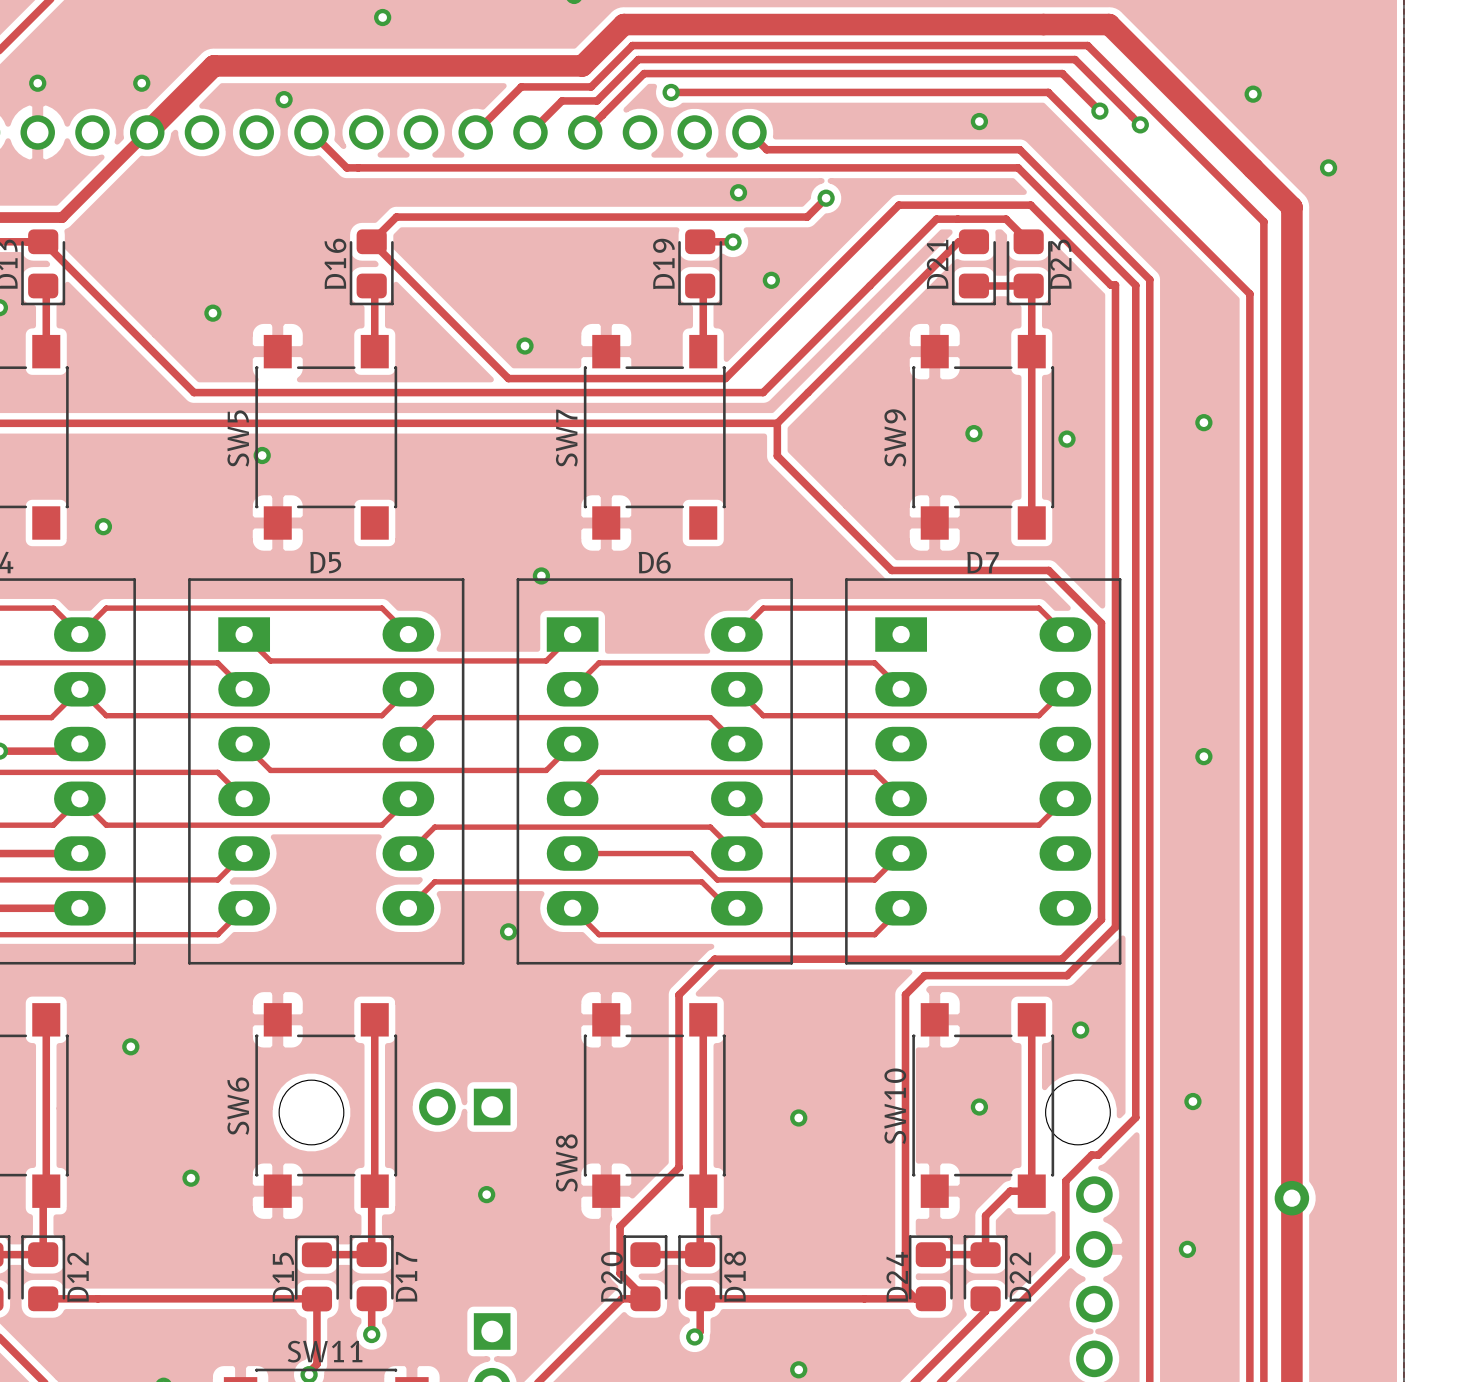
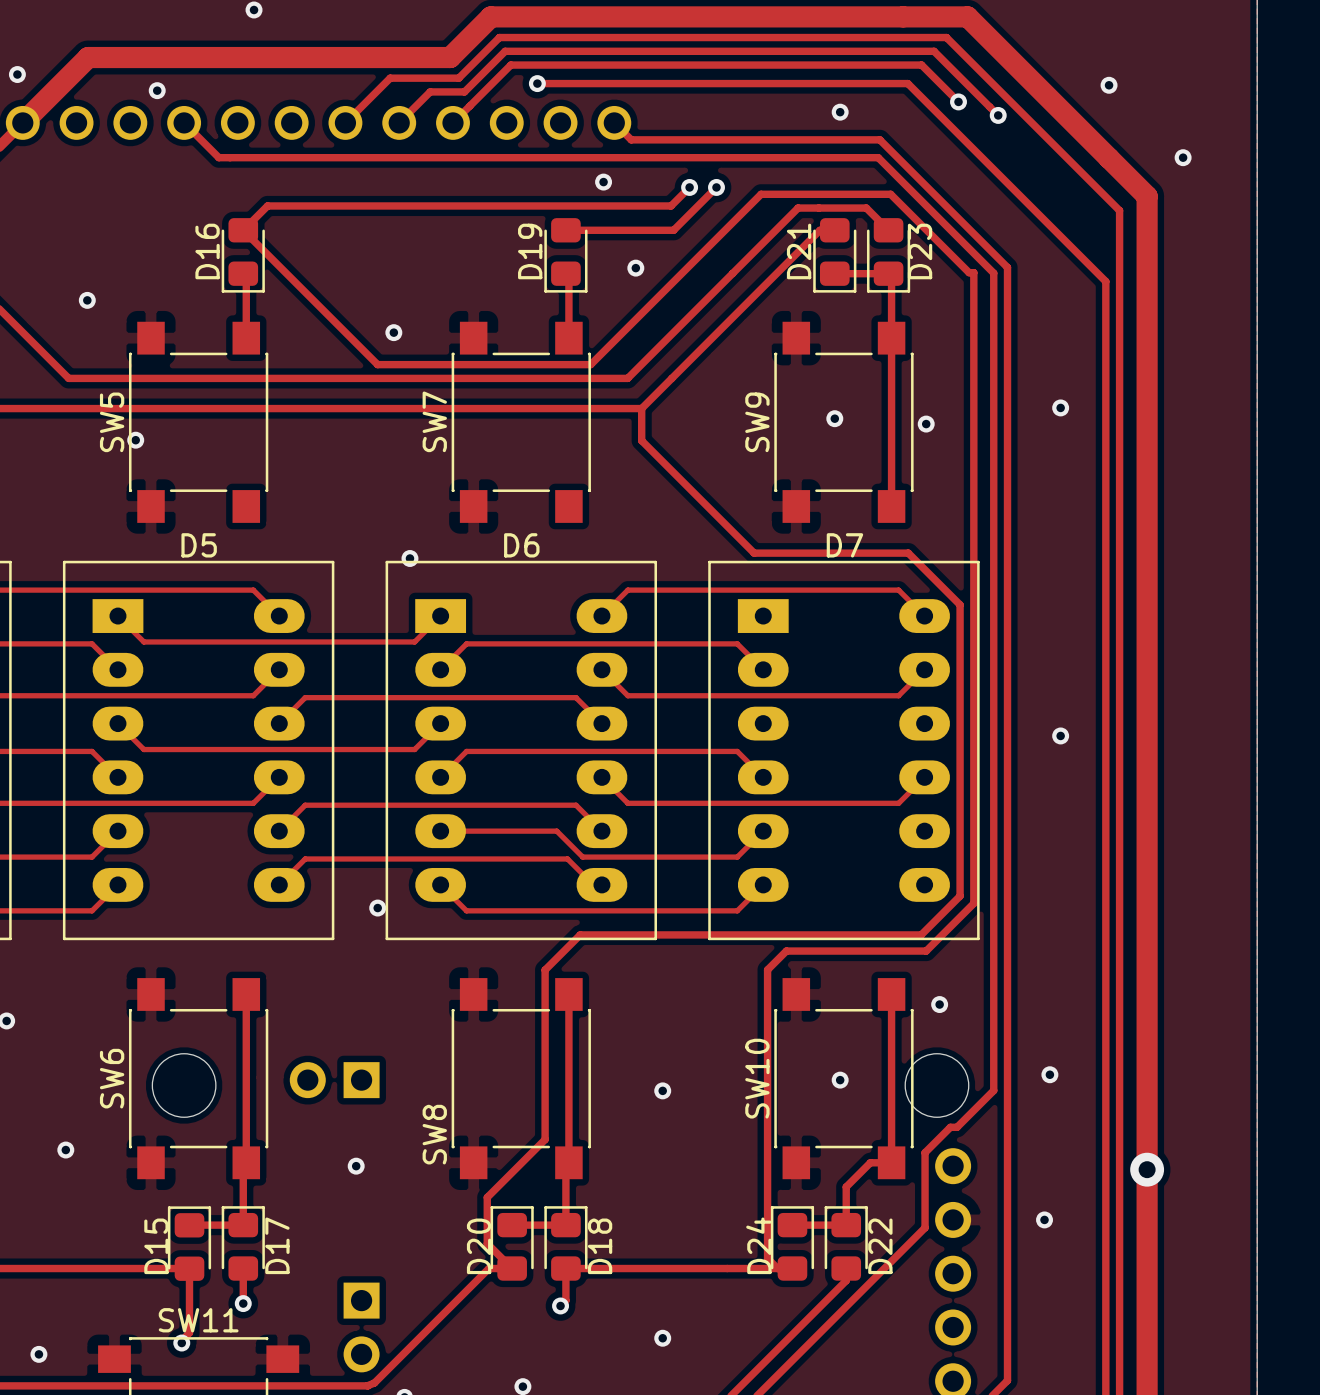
track: none -> (716, 187) (673, 230) (597, 230)
via position: (733, 241) -> (716, 187)

